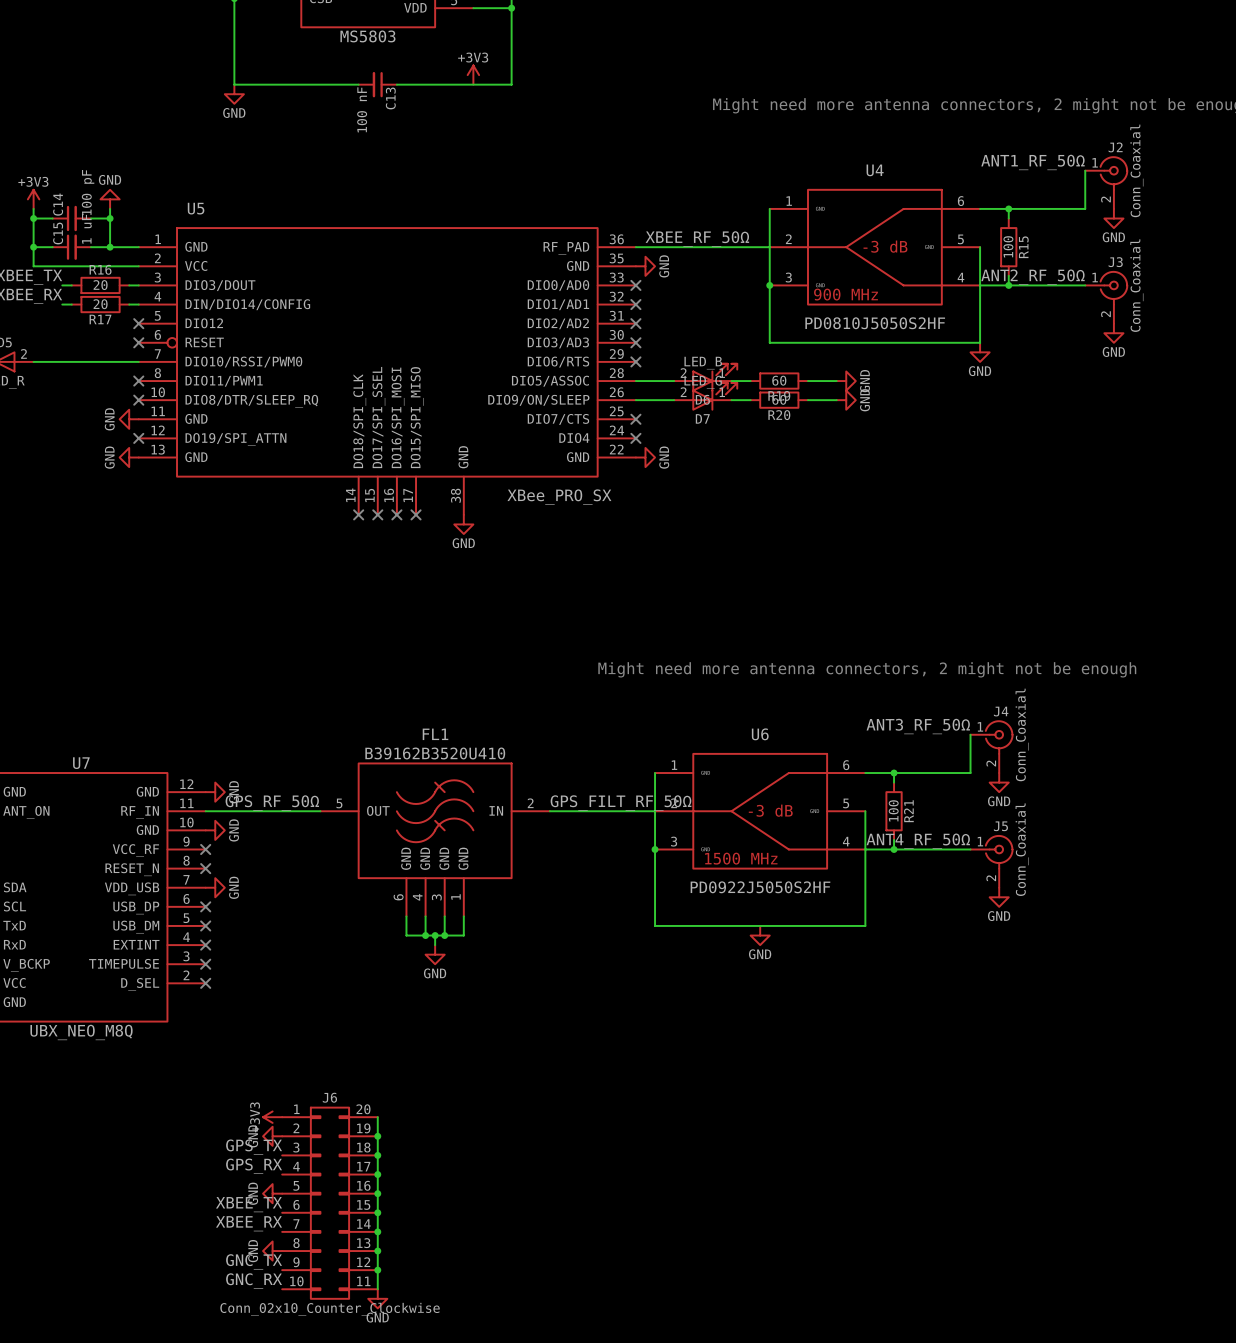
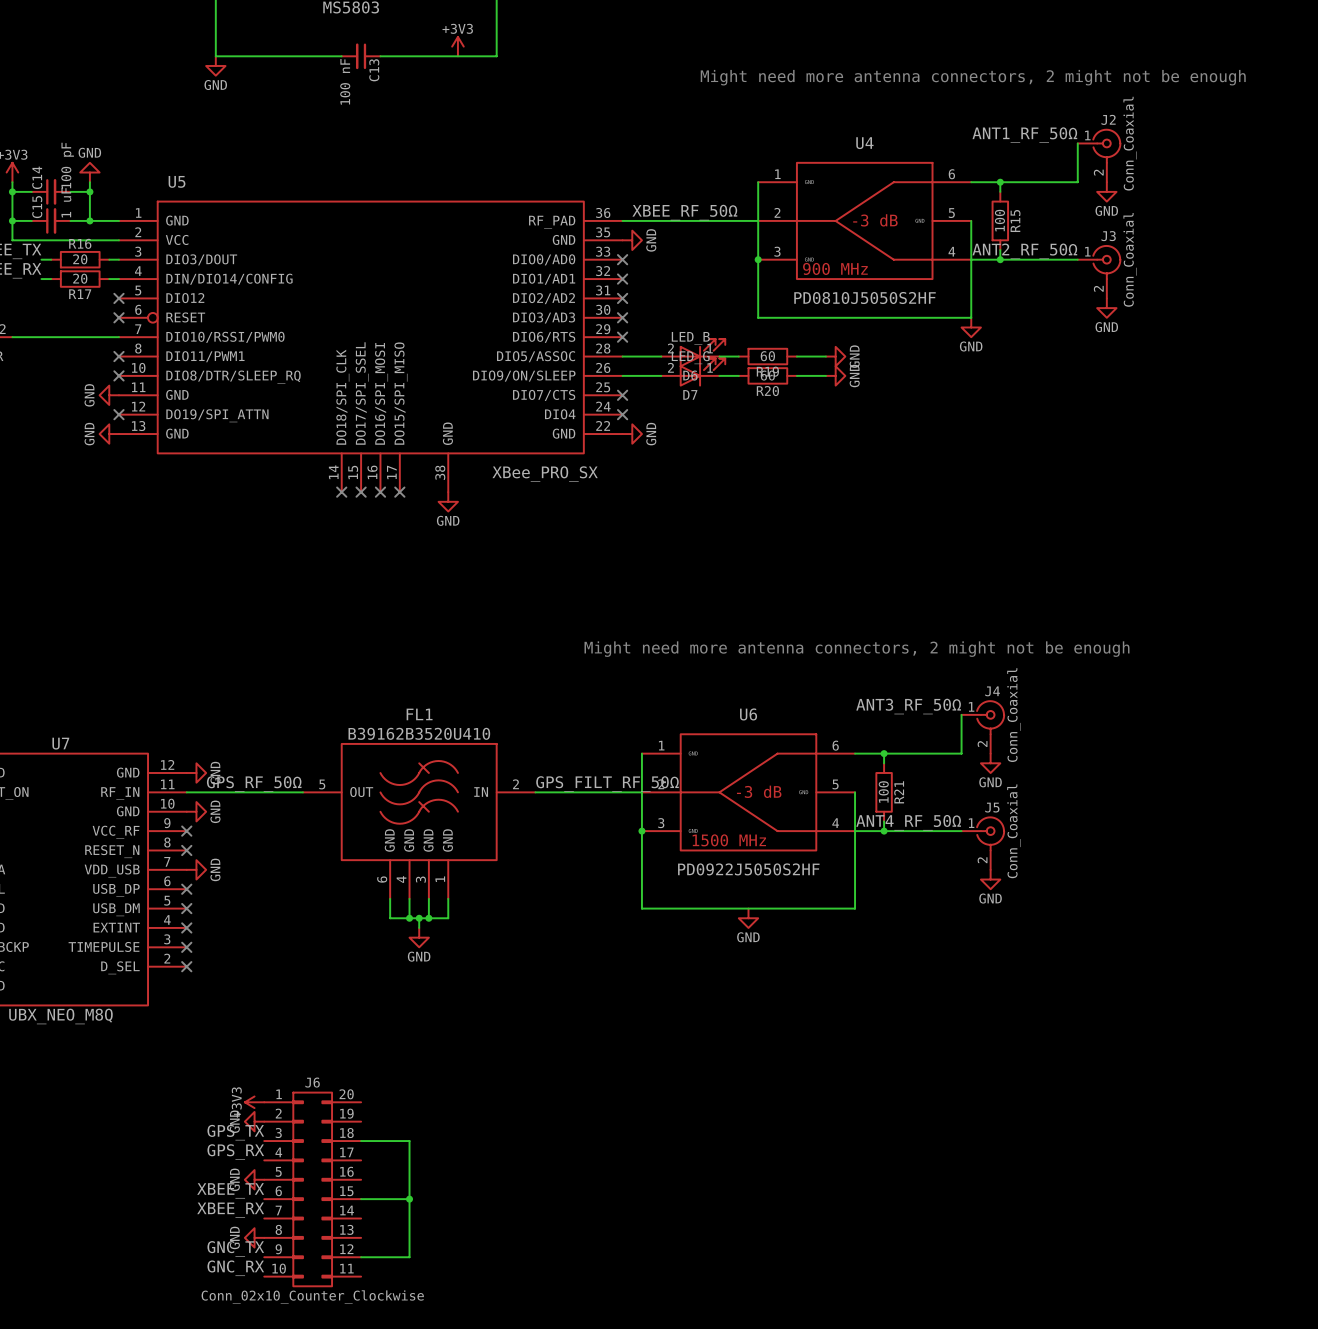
wire: (377, 1117) (377, 1289) -> none
junction: (377, 1136) -> none
wire: none -> (361, 1141) (409, 1141) (409, 1257) (361, 1257)
junction: (377, 1155) -> none
junction: (377, 1174) -> none
junction: (377, 1193) -> none
wire: none -> (361, 1199) (409, 1199)
junction: (377, 1212) -> none
junction: none -> (409, 1199)
junction: (377, 1231) -> none
junction: (377, 1251) -> none
junction: (377, 1270) -> none
power symbol: GND (377, 1298) -> none

